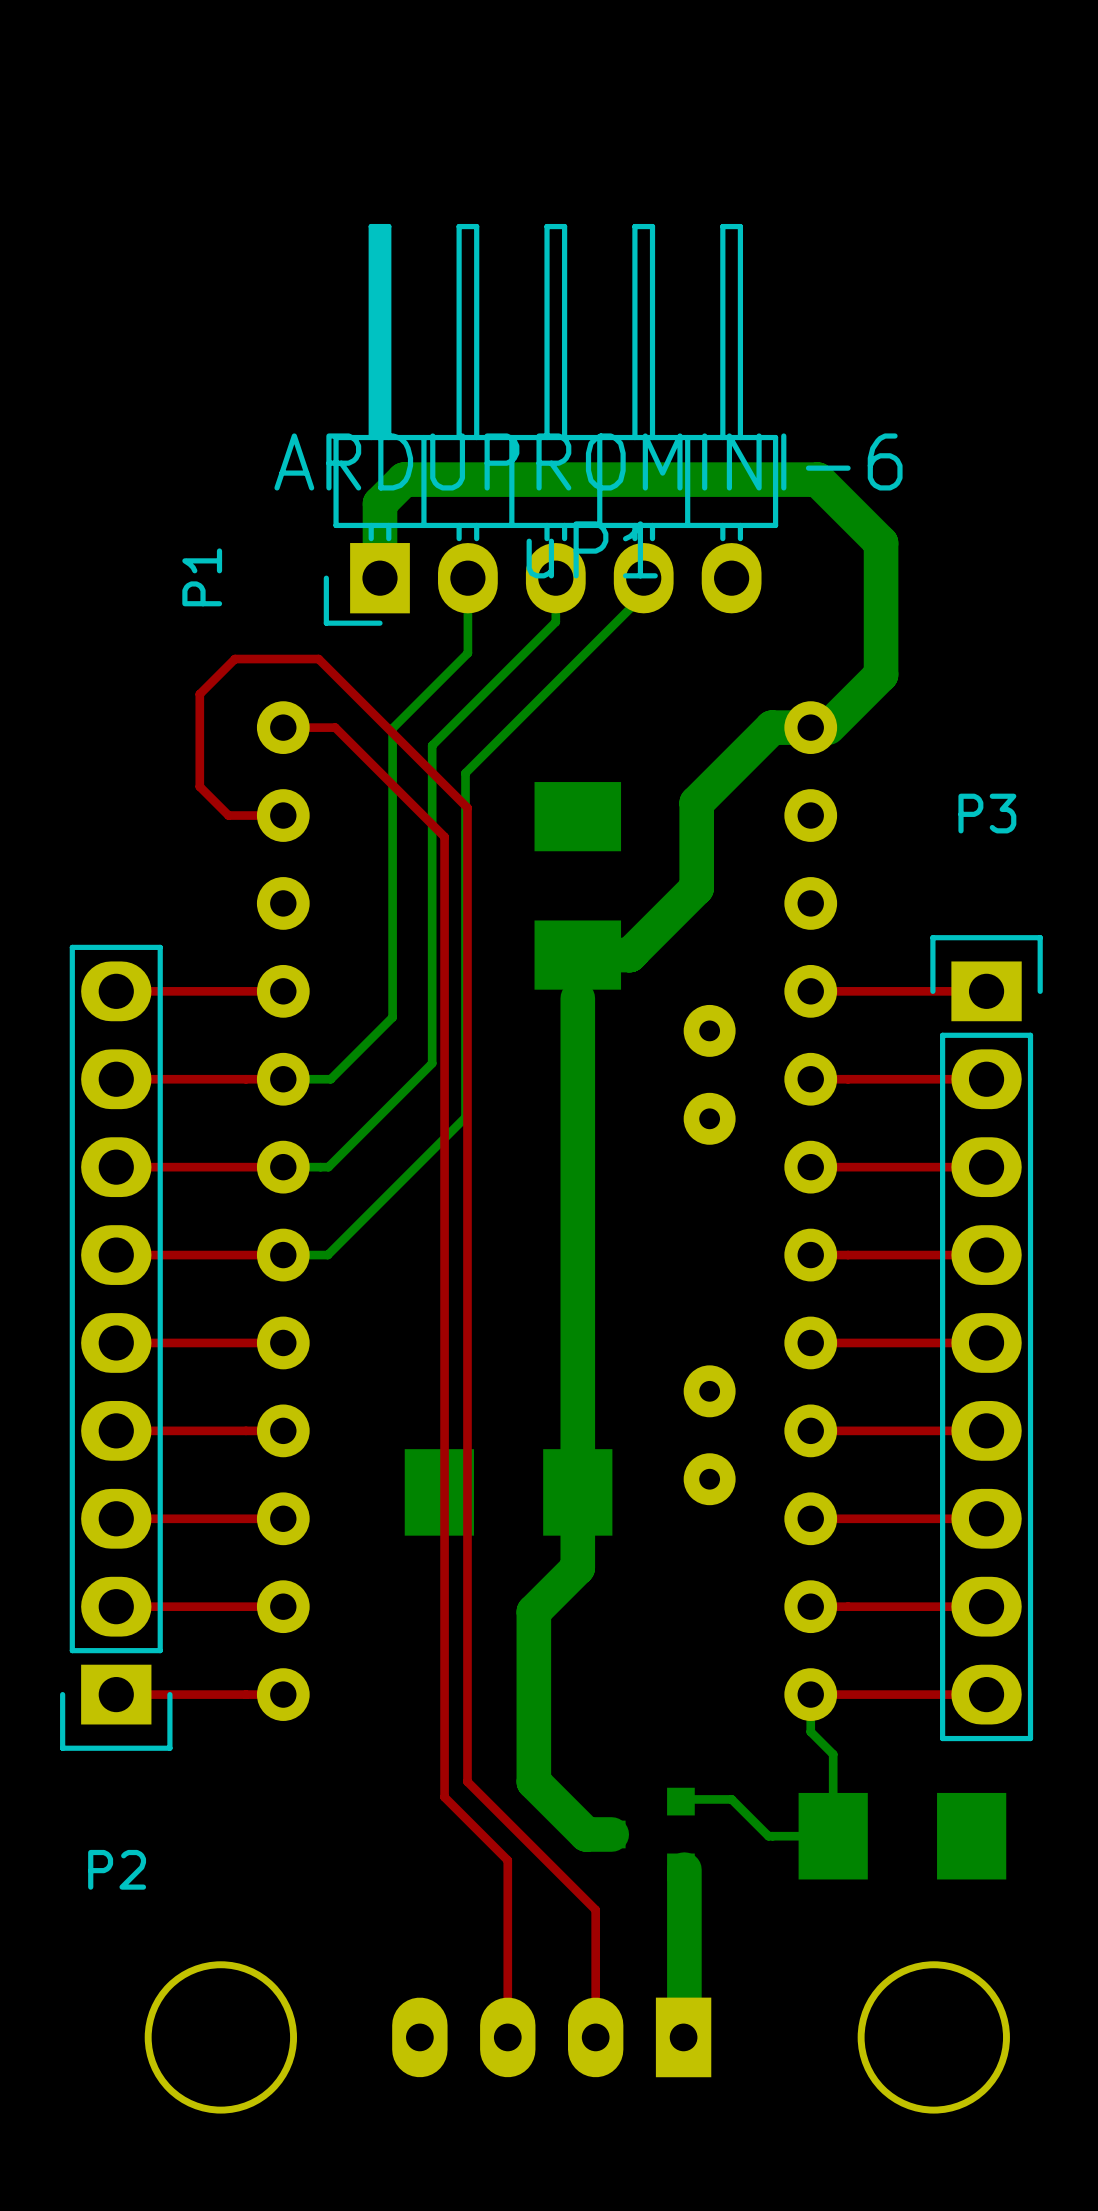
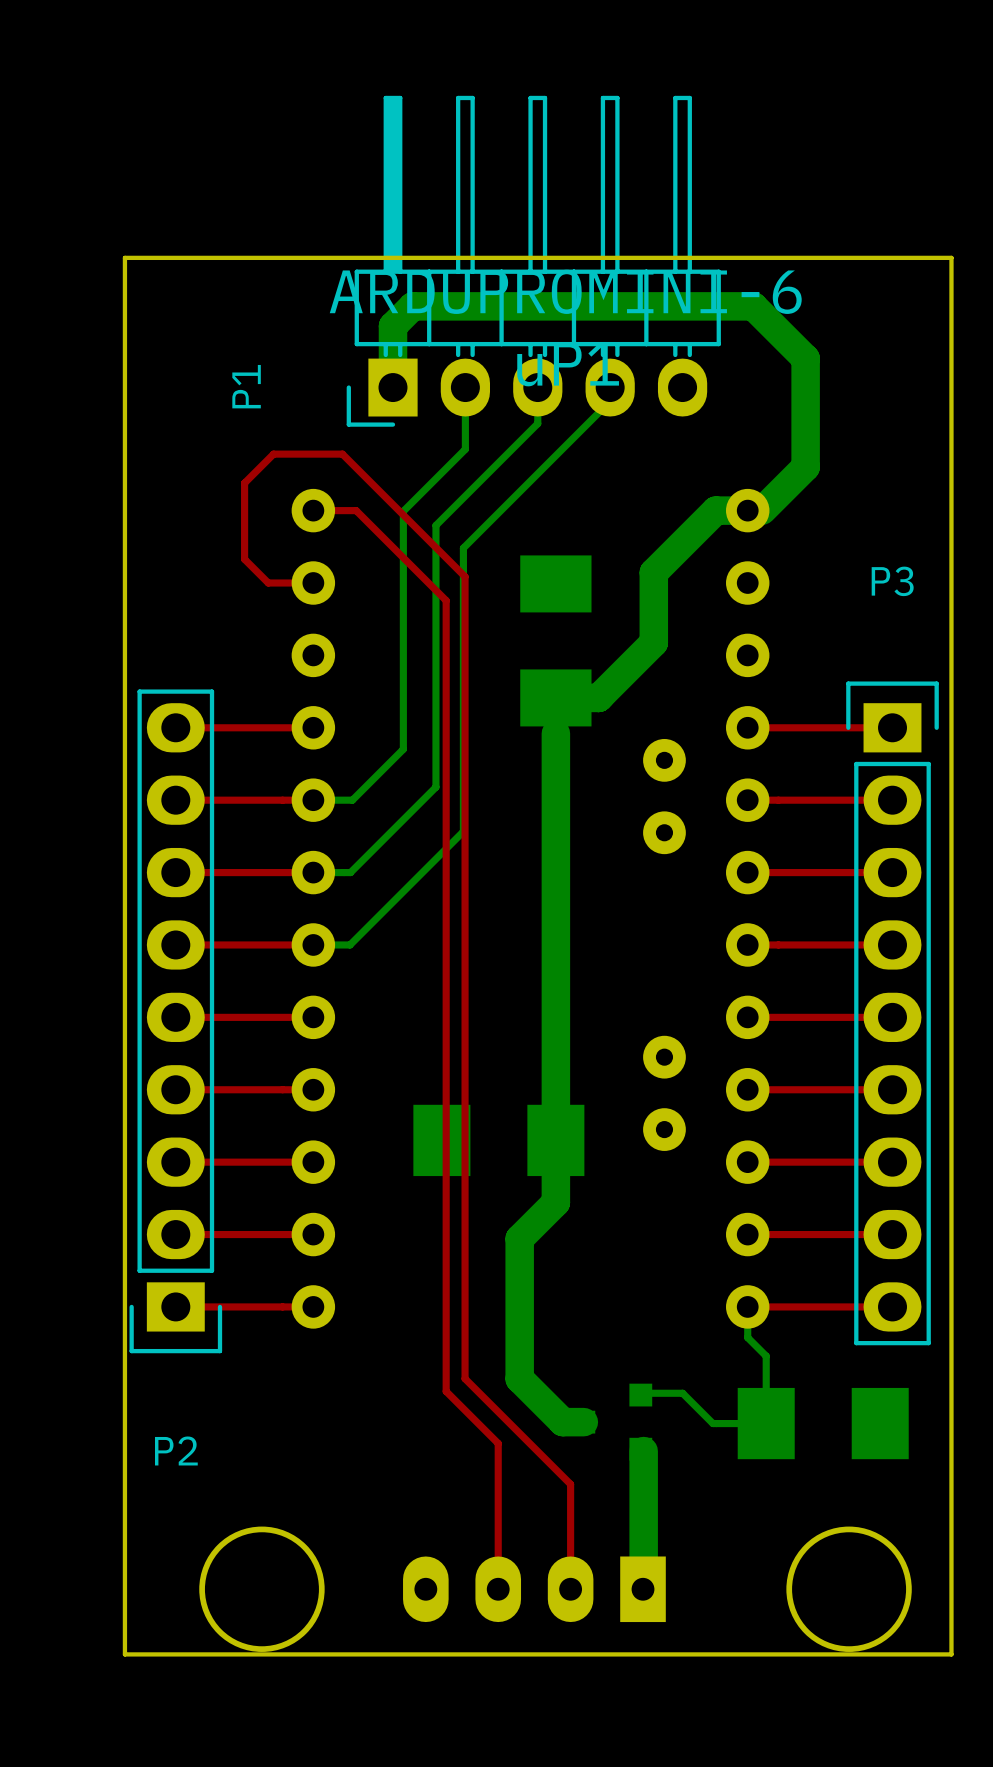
board edge: none -> (124, 257) (124, 1654) (951, 1654) (951, 257) (124, 257)

